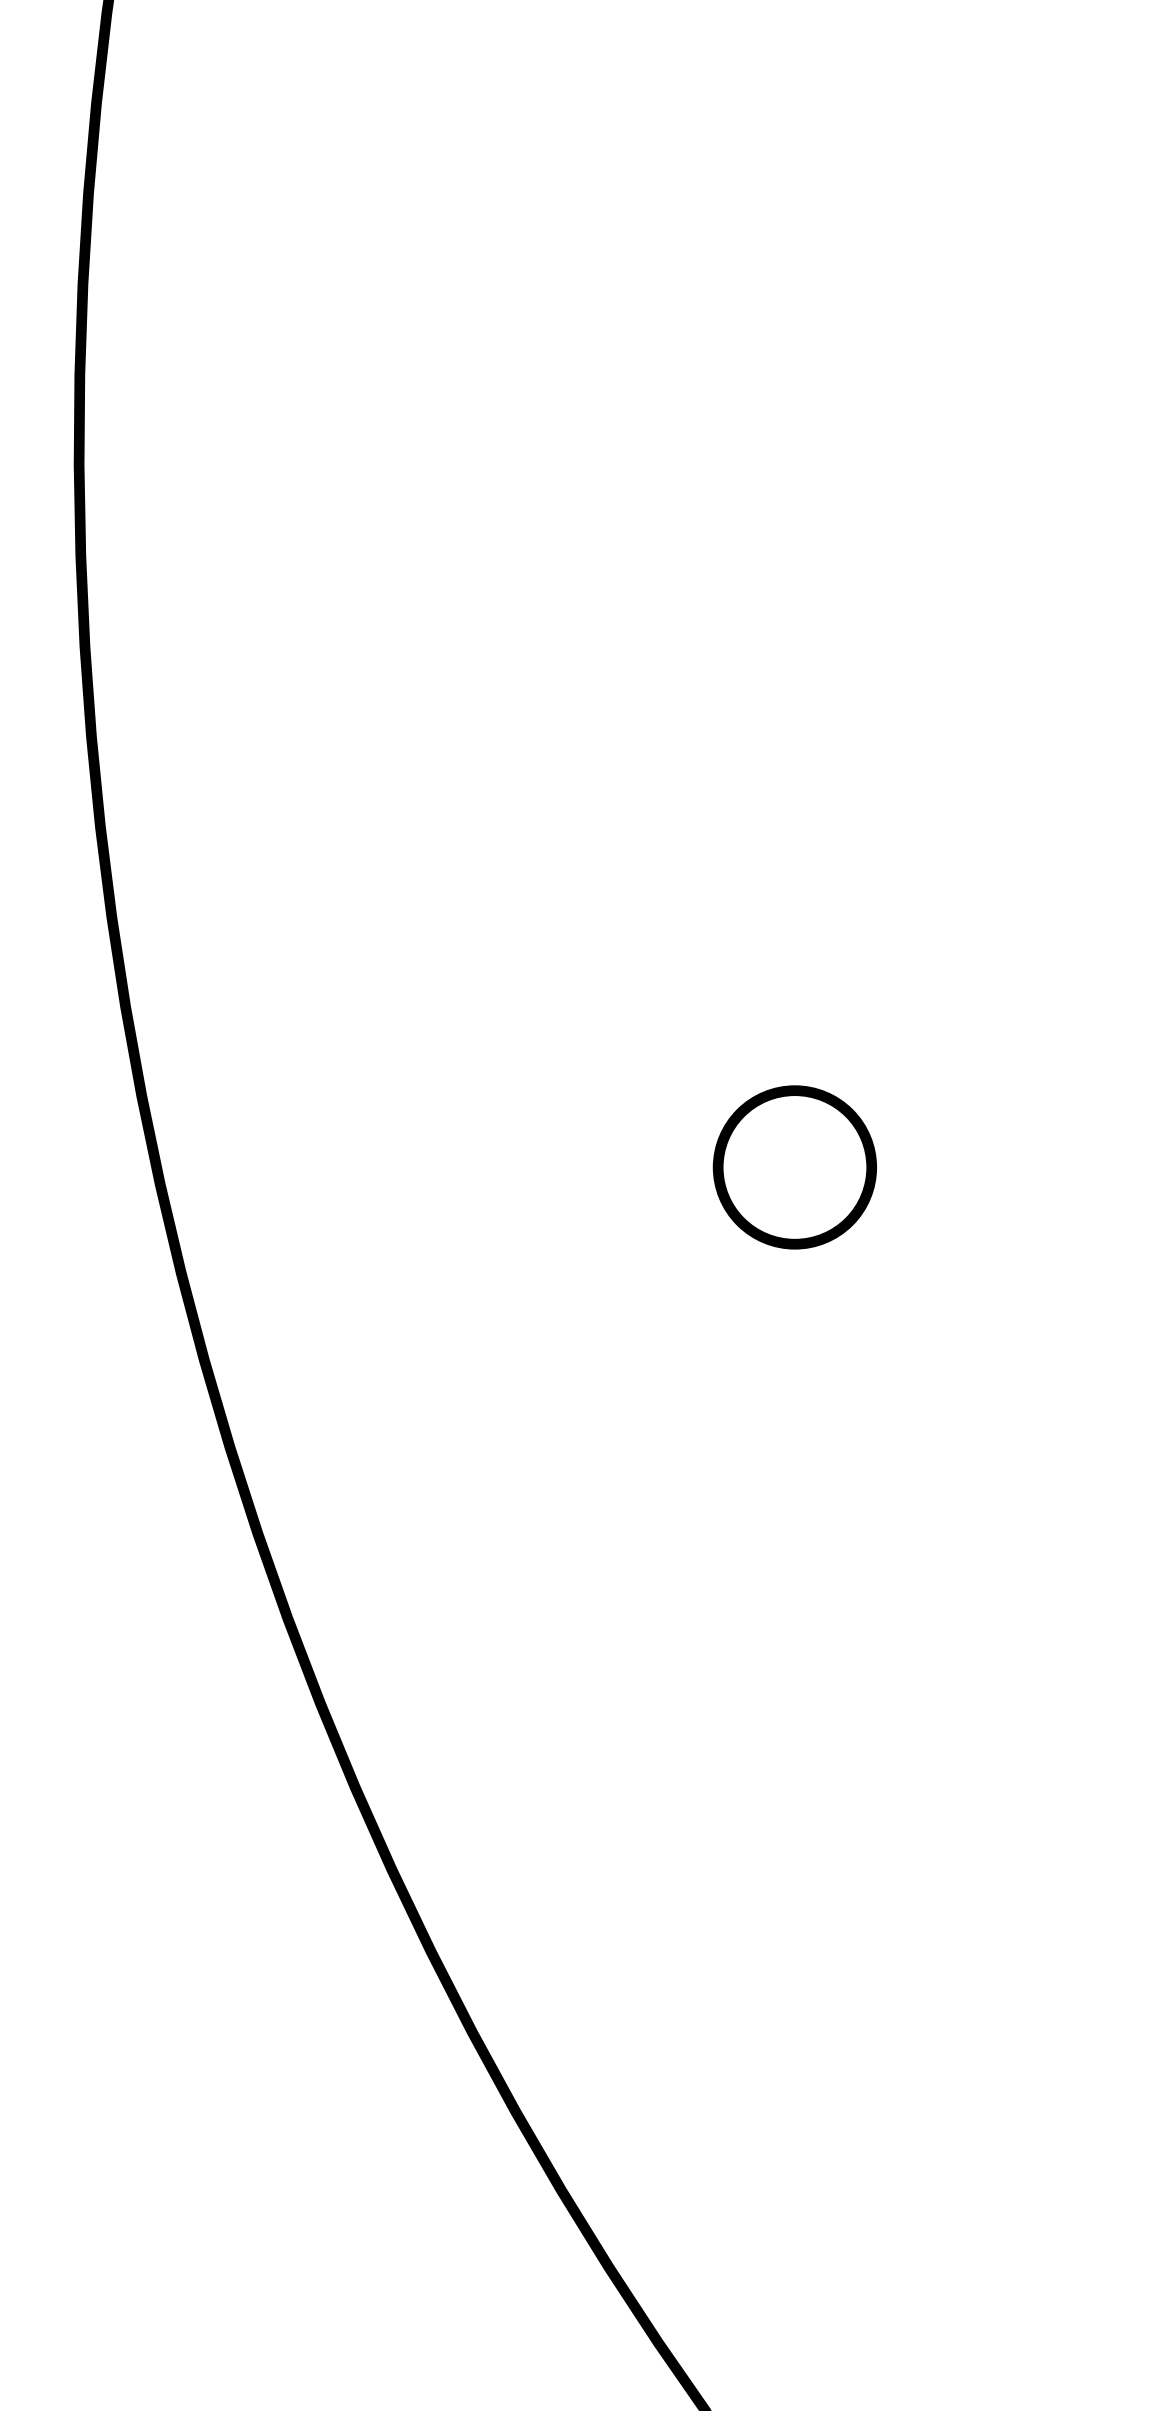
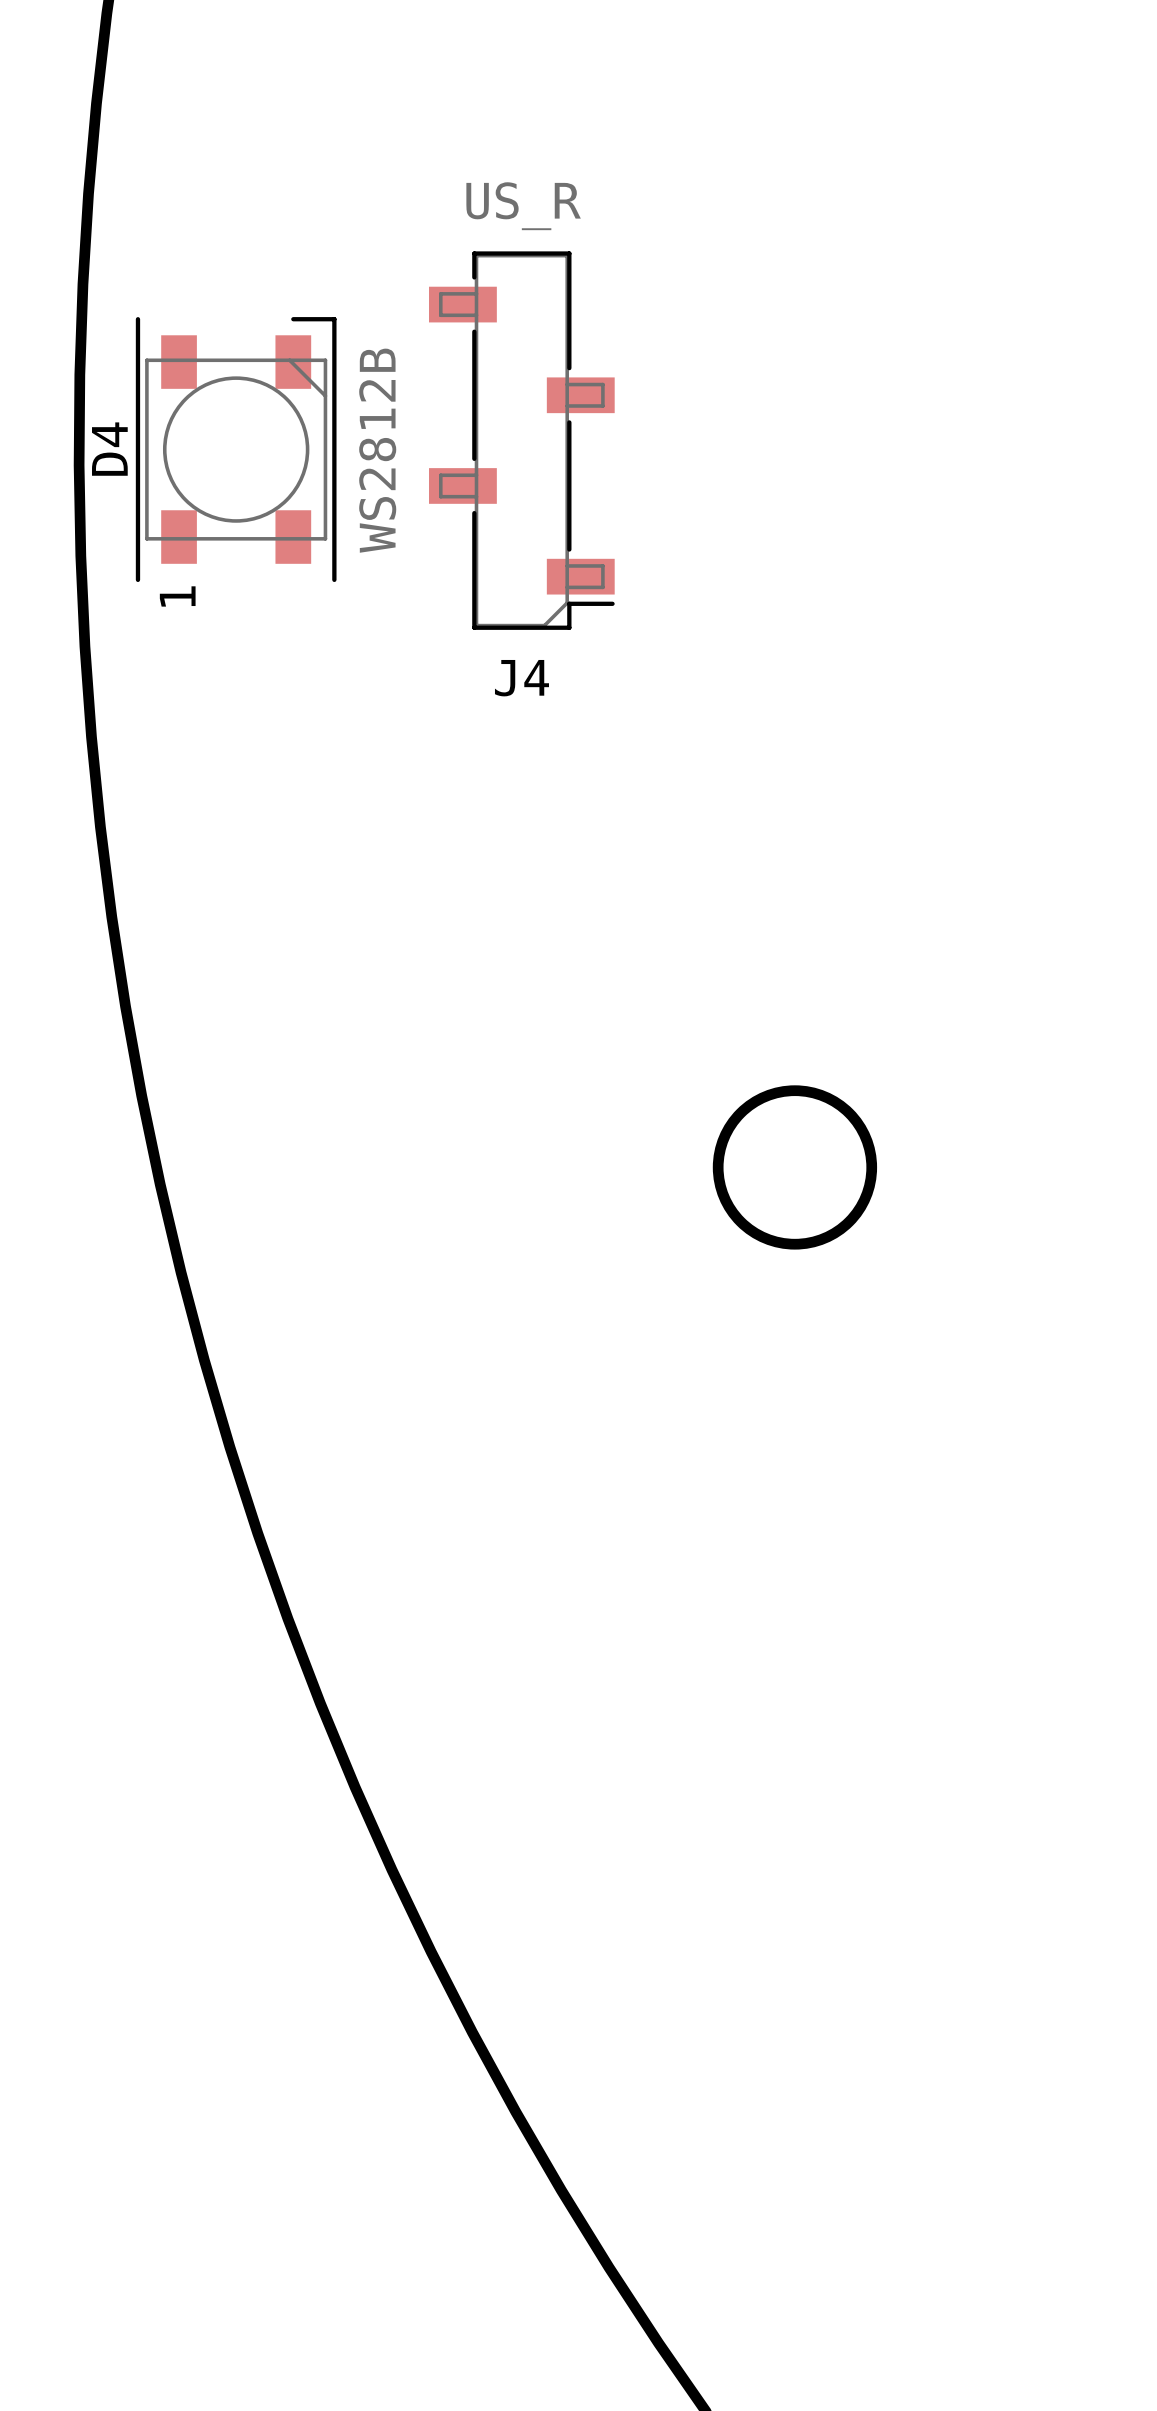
J4: none -> US_R (521, 440)
D4: none -> WS2812B (236, 449)

